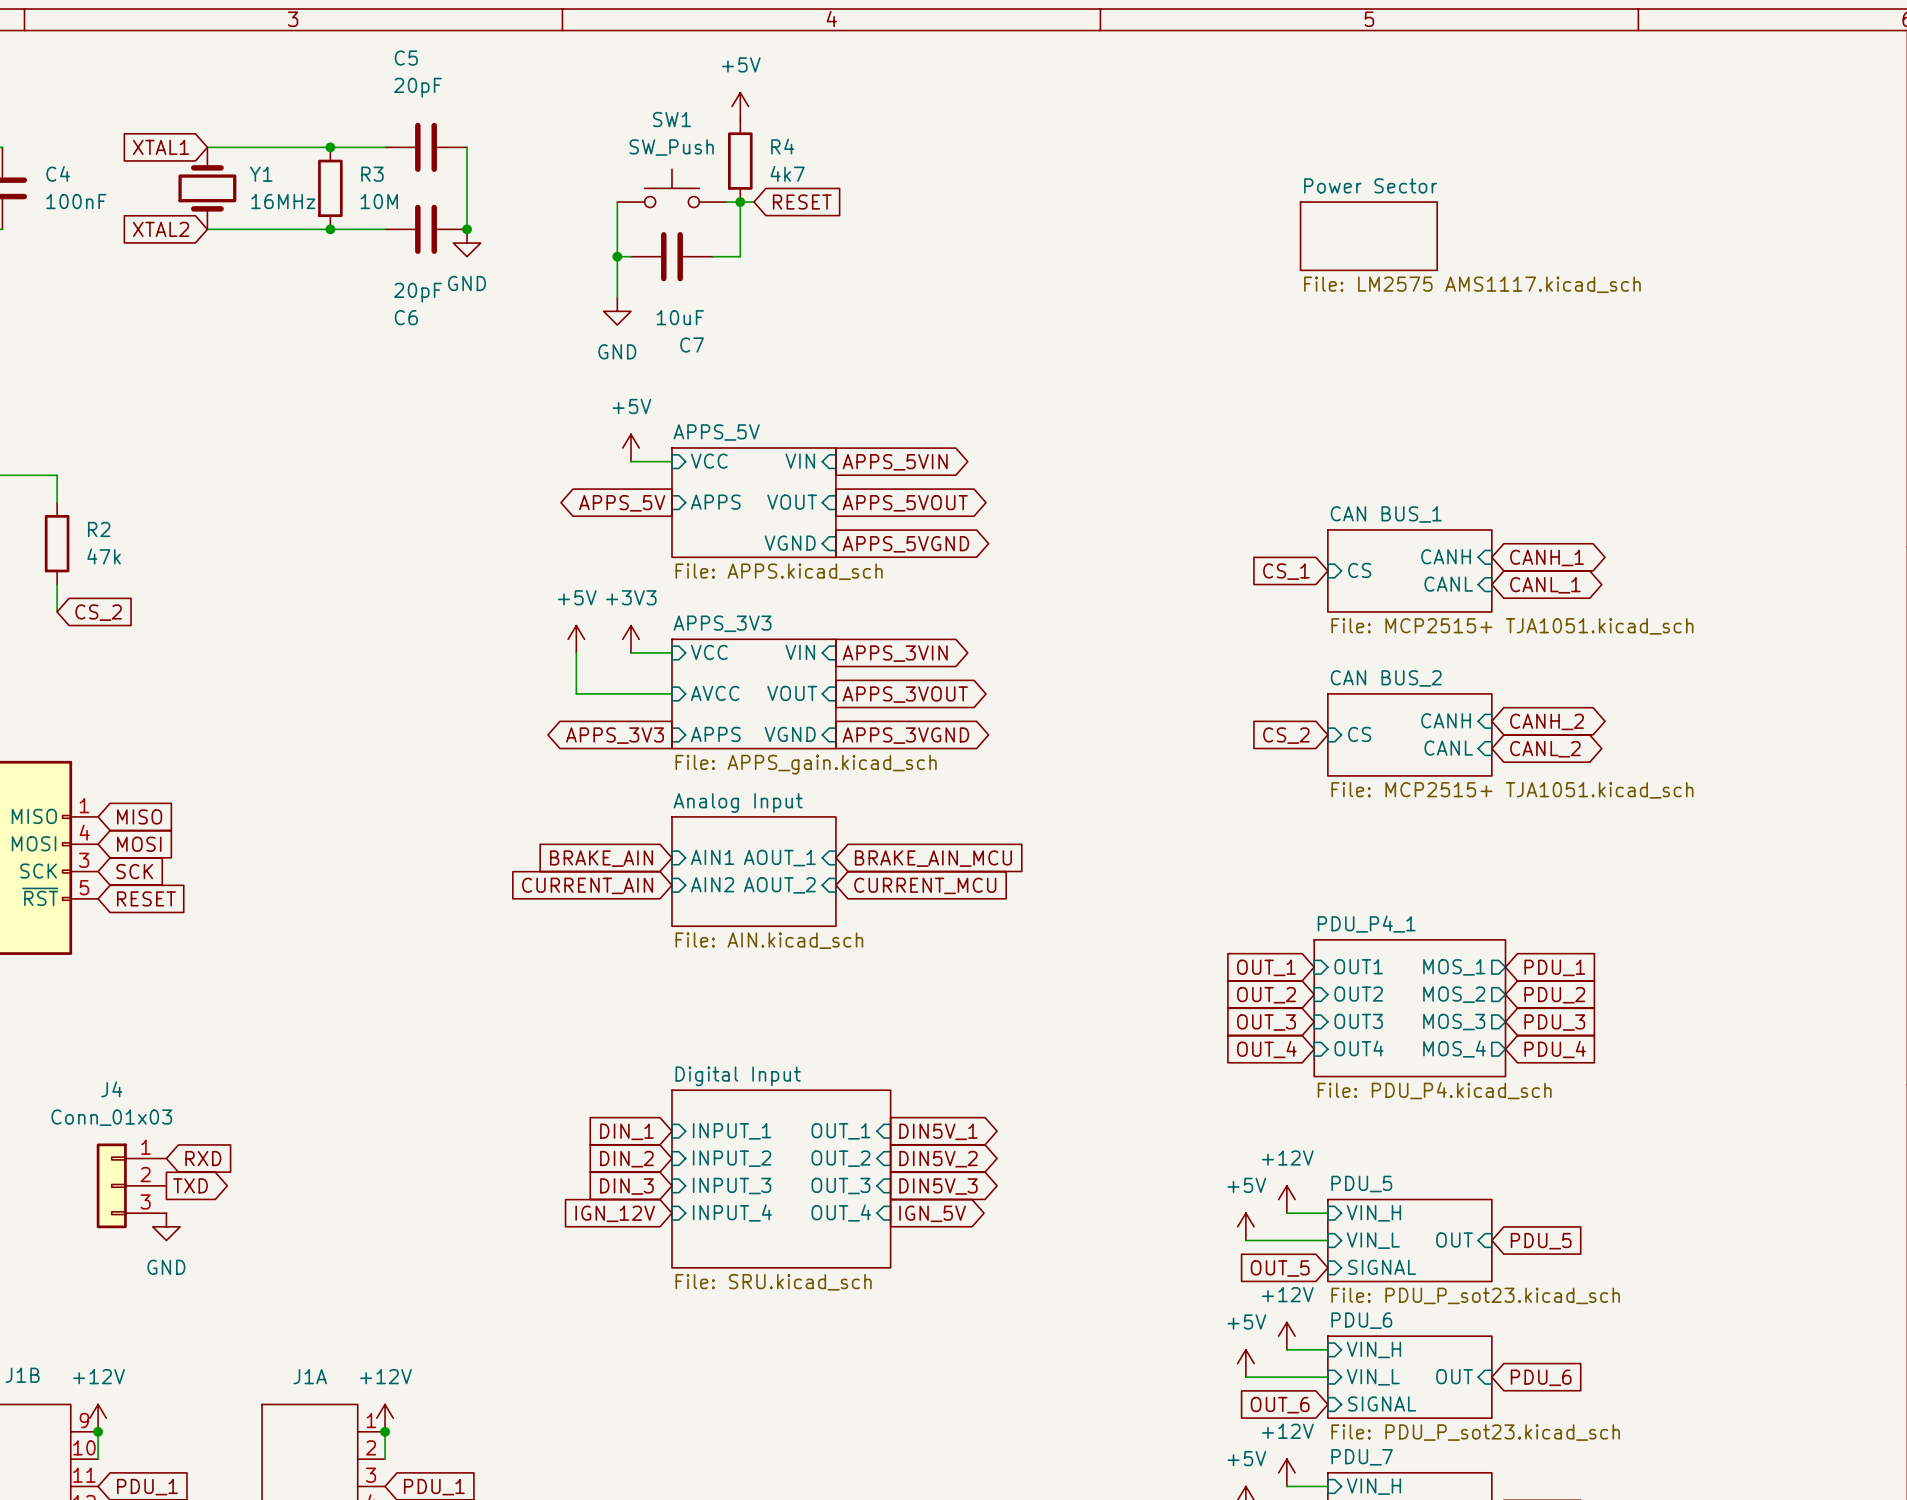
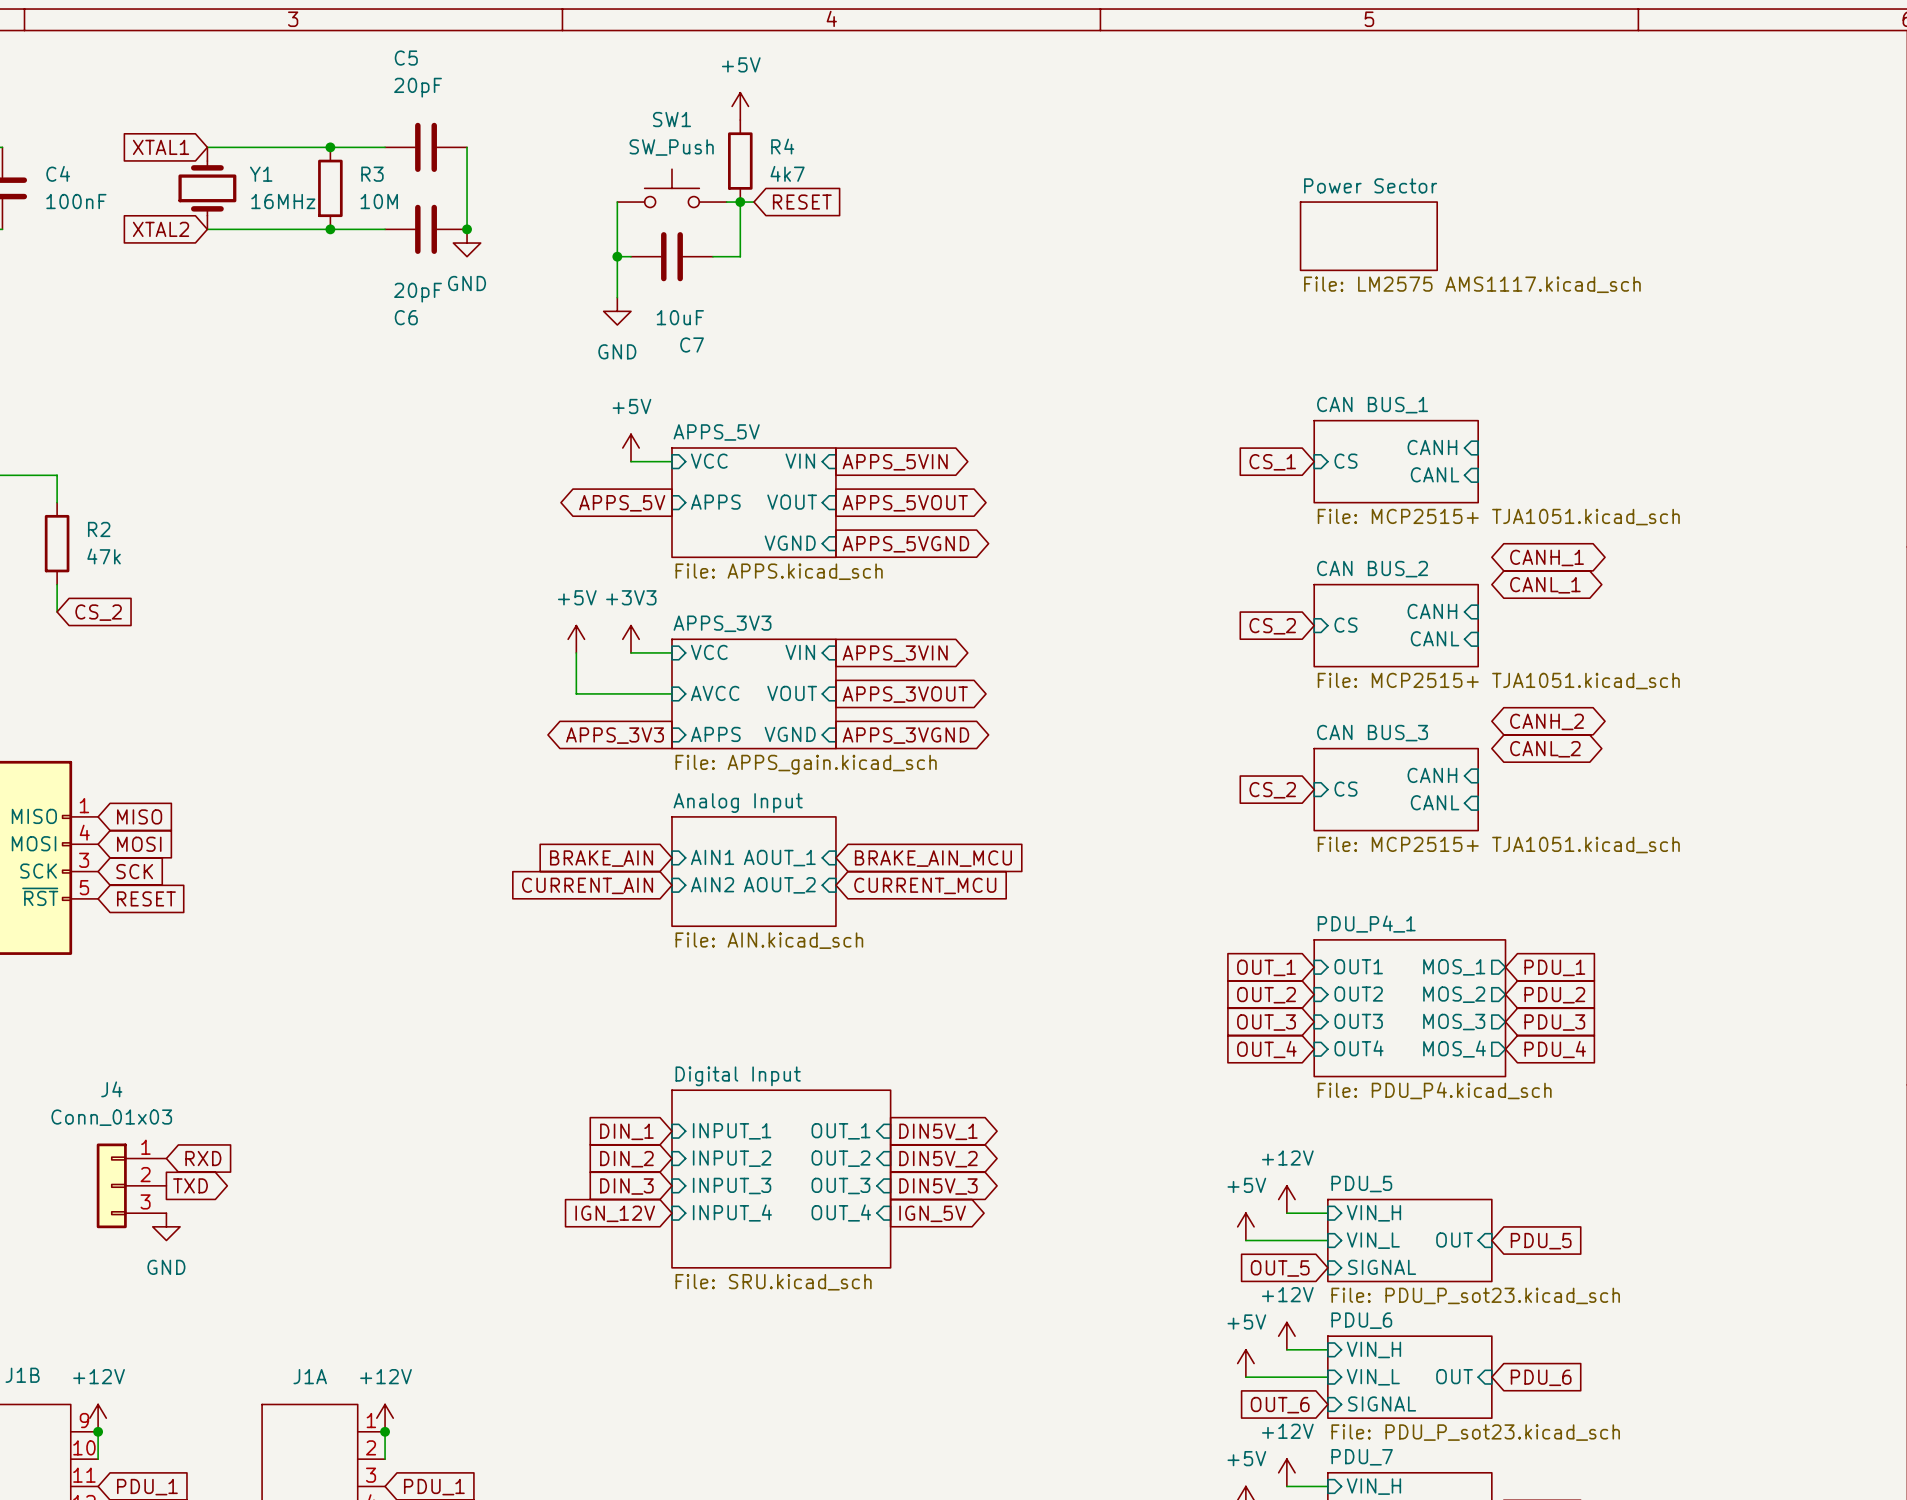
sheet pin: none -> CANH (1432, 447)
sheet pin: none -> CS (1345, 461)
sheet pin: none -> CANL (1435, 474)
sheet pin: CANH (1446, 556) -> none
sheet pin: CS (1359, 570) -> none
sheet CAN BUS_1 position: (1409, 570) -> (1396, 461)
global label position: CS_1 (1286, 571) -> CS_1 (1272, 462)
sheet pin: CANL (1448, 584) -> CANH (1432, 611)
sheet pin: none -> CS (1345, 625)
global label: none -> CS_2 (1272, 626)
sheet pin: none -> CANL (1435, 638)
sheet pin: CANH (1446, 720) -> none
sheet pin: CS (1359, 734) -> none
sheet CAN BUS_2 position: (1409, 734) -> (1396, 625)
global label: CS_2 (1286, 735) -> none
sheet pin: CANL (1448, 748) -> CANH (1432, 775)
sheet pin: none -> CS (1345, 789)
sheet CAN BUS_3: none -> File: MCP2515+ TJA1051.kicad_sch (1396, 789)
global label: none -> CS_2 (1272, 790)
sheet pin: none -> CANL (1435, 802)

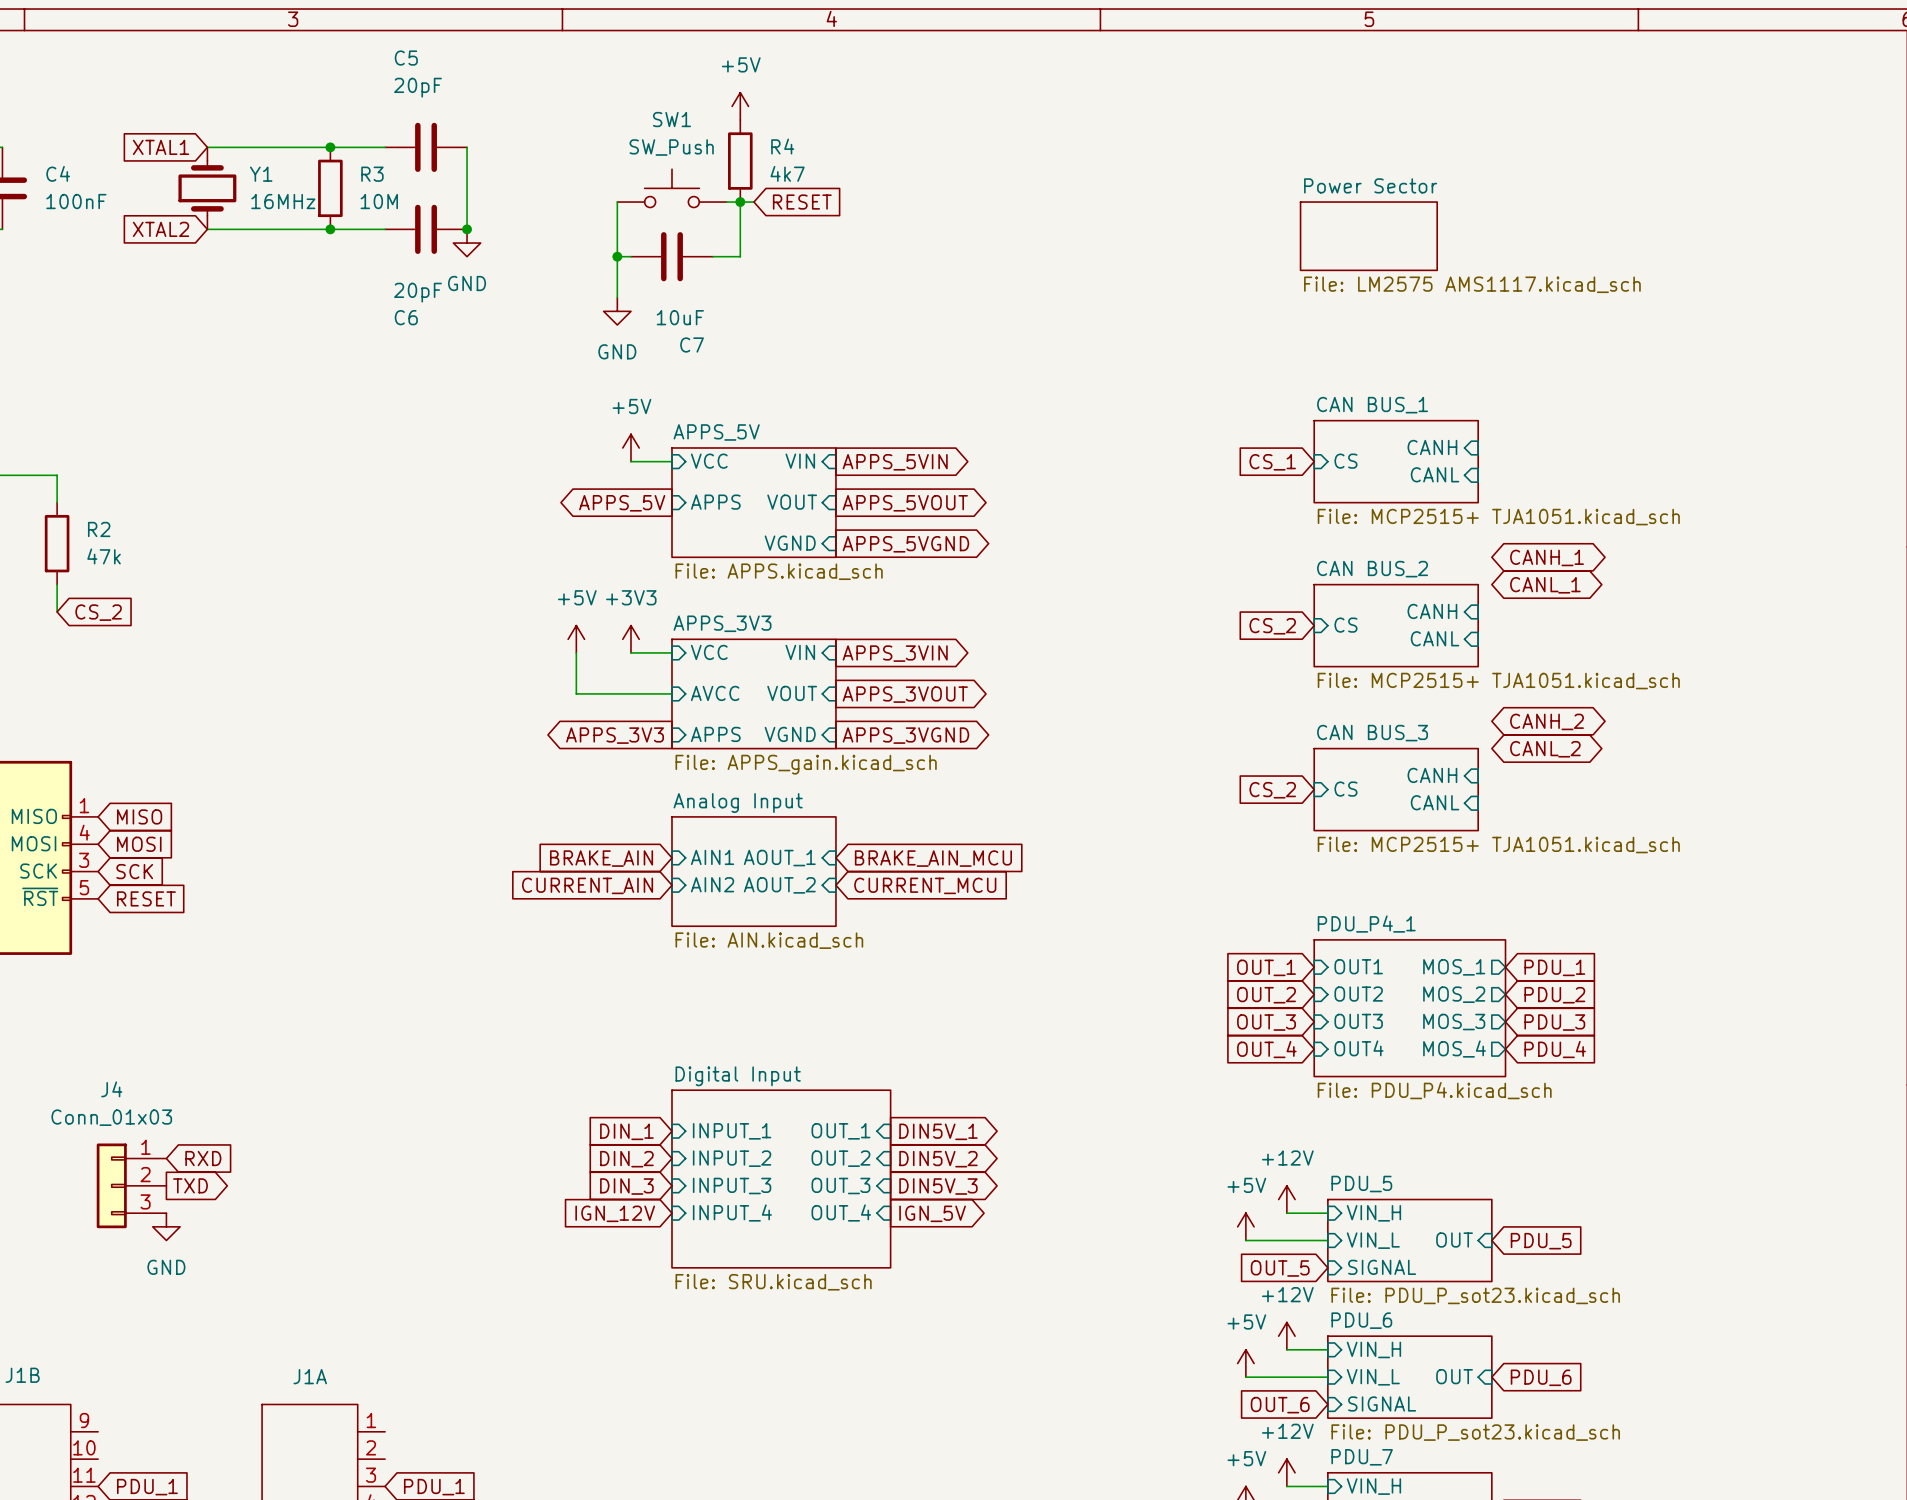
power symbol: +12V (98, 1418) -> none
power symbol: +12V (385, 1418) -> none
wire: (98, 1431) (98, 1459) -> none
junction: (98, 1431) -> none
wire: (385, 1431) (385, 1459) -> none
junction: (385, 1431) -> none

